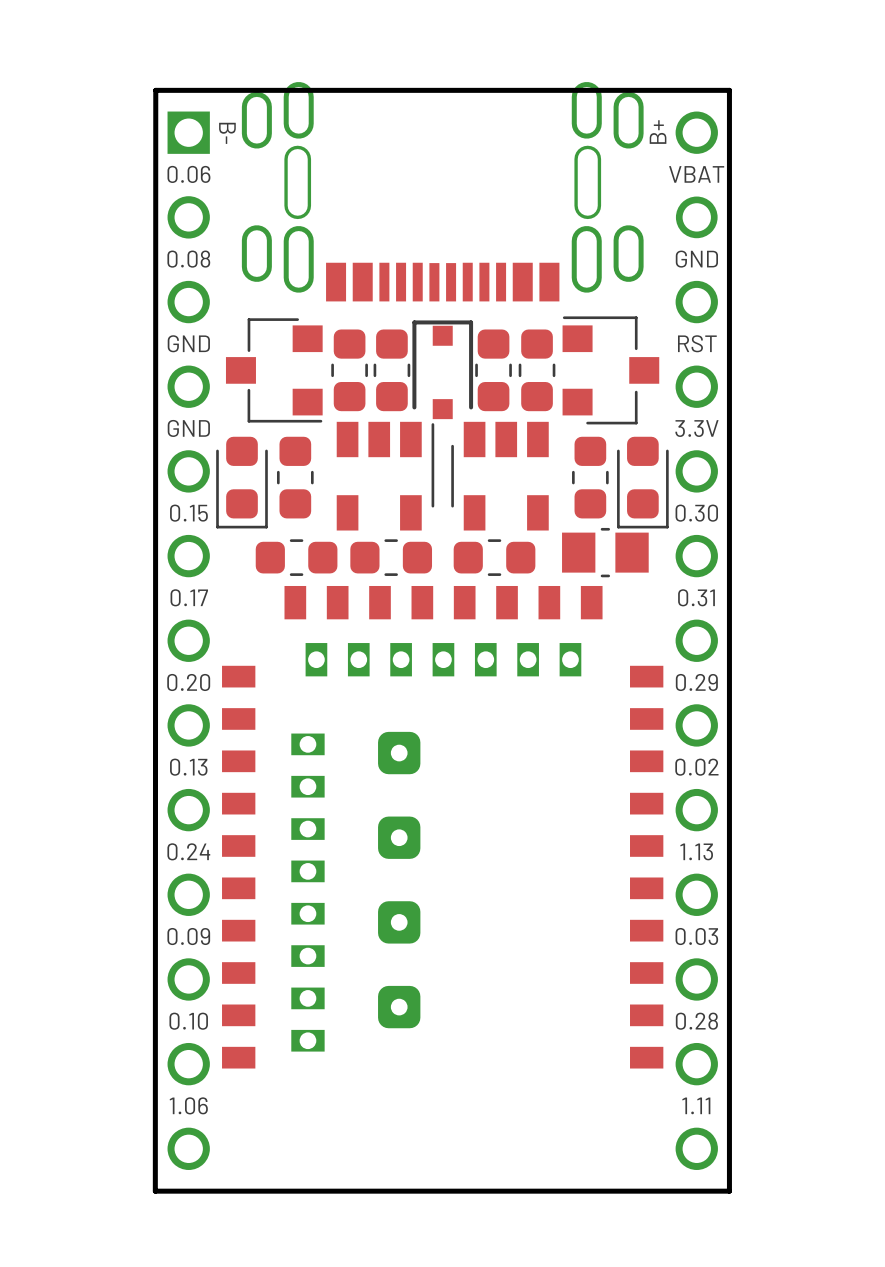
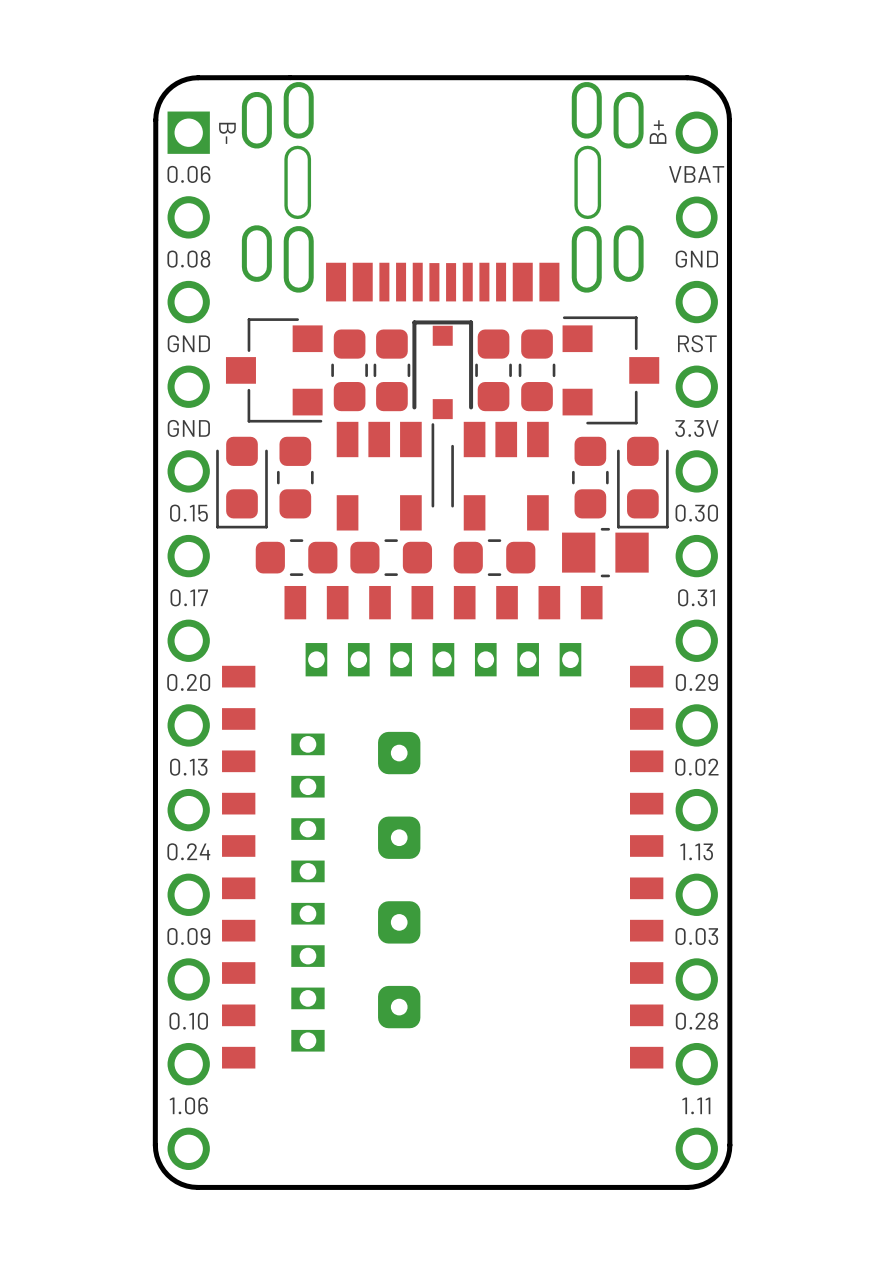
board edge: (155, 120) (155, 90) (729, 90) (729, 1191) (155, 1191) (155, 1145) -> (155, 120) (158, 103) (168, 90) (181, 80) (198, 77) (687, 77) (708, 83) (723, 98) (729, 120) (729, 1145) (726, 1161) (717, 1175) (703, 1184) (693, 1187) (197, 1187) (181, 1184) (167, 1175) (158, 1161) (155, 1145)

